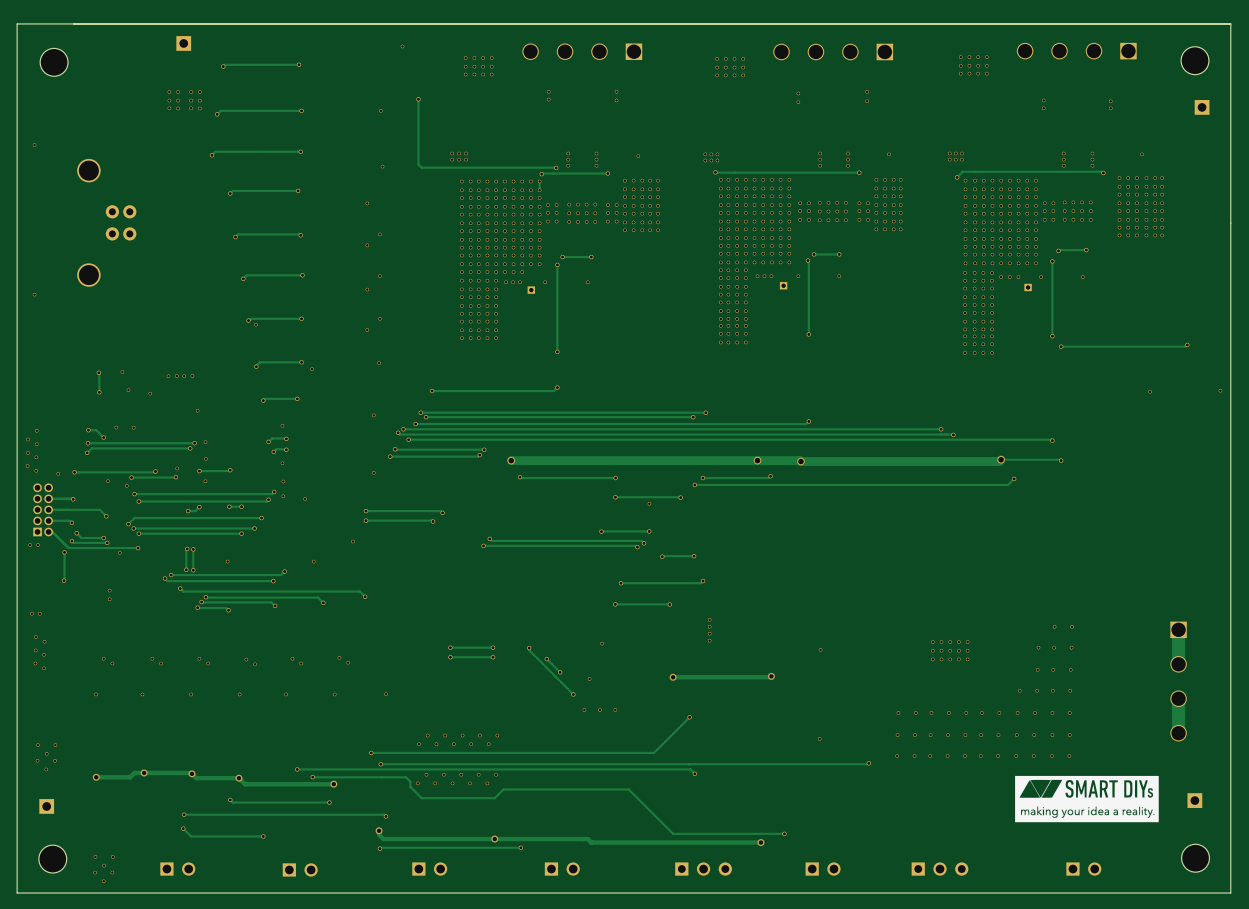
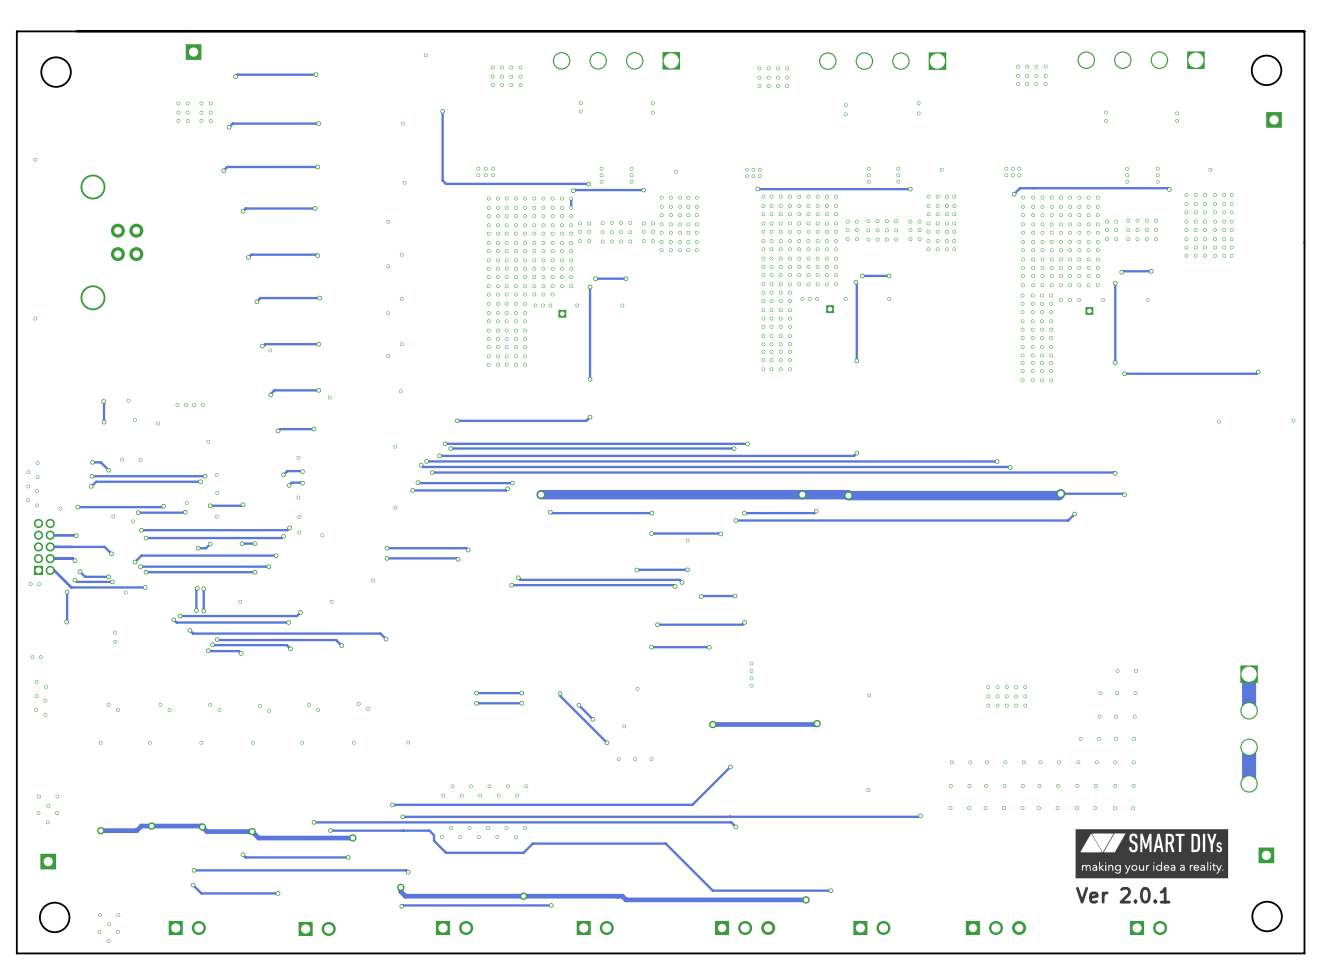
text: none -> Ver 2.0.1 (1123, 895)

